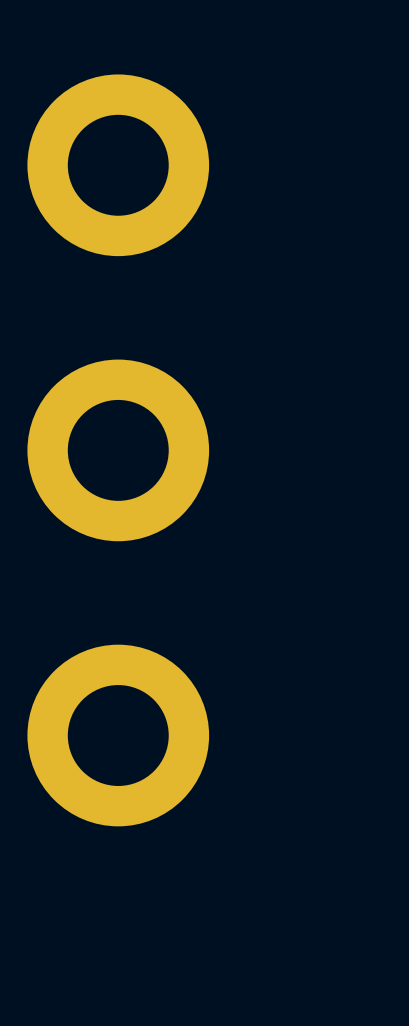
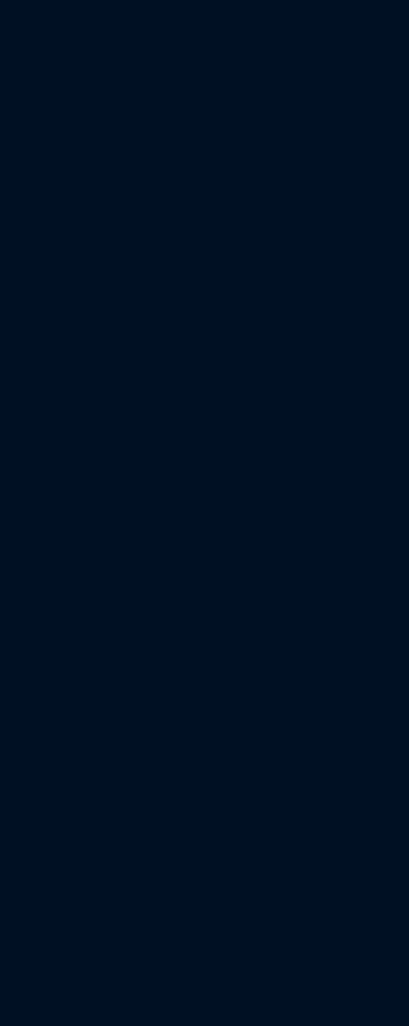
part: (118, 165) -> none
part: (118, 450) -> none
part: (118, 735) -> none

